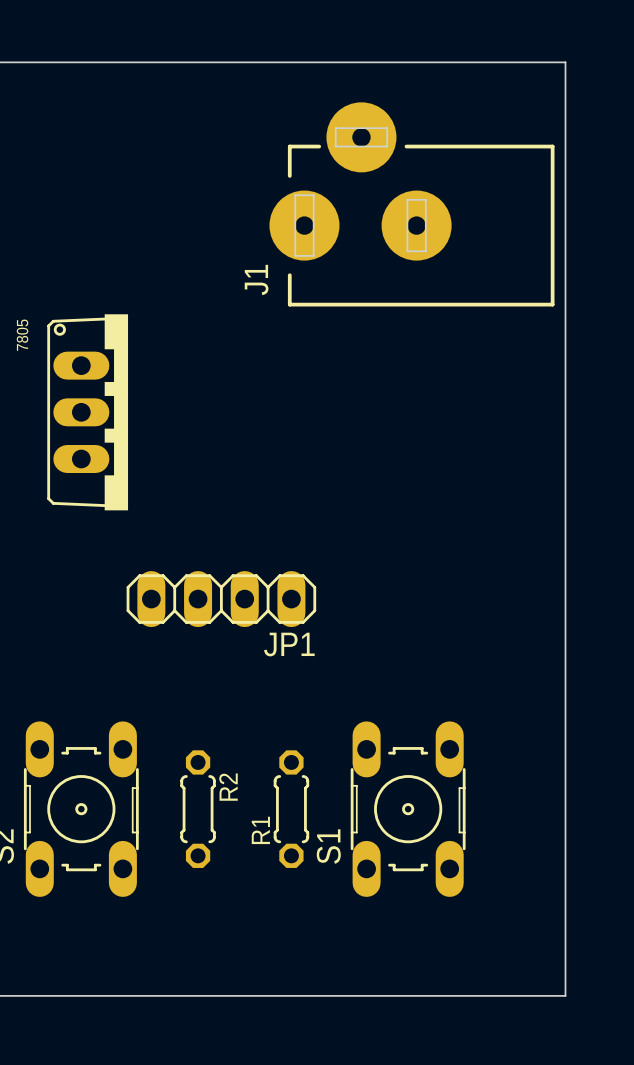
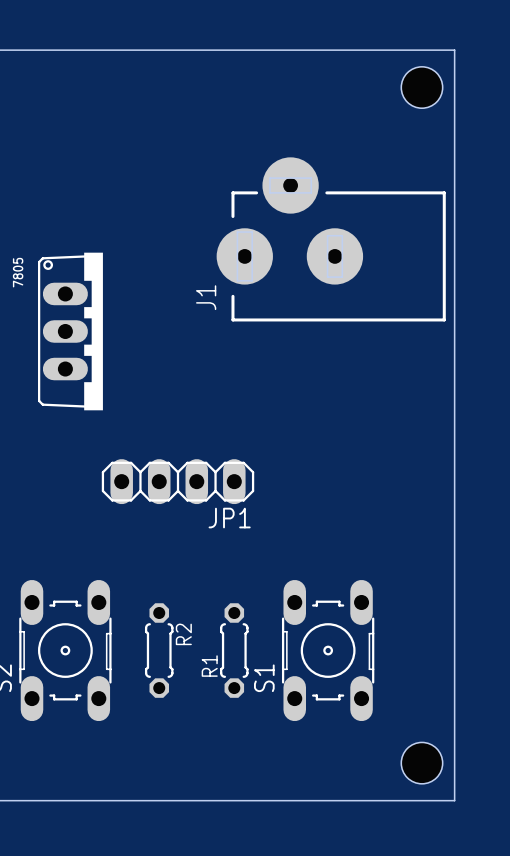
hole: none -> (421, 87)
J1 position: (411, 204) -> (331, 239)
hole: none -> (421, 763)

